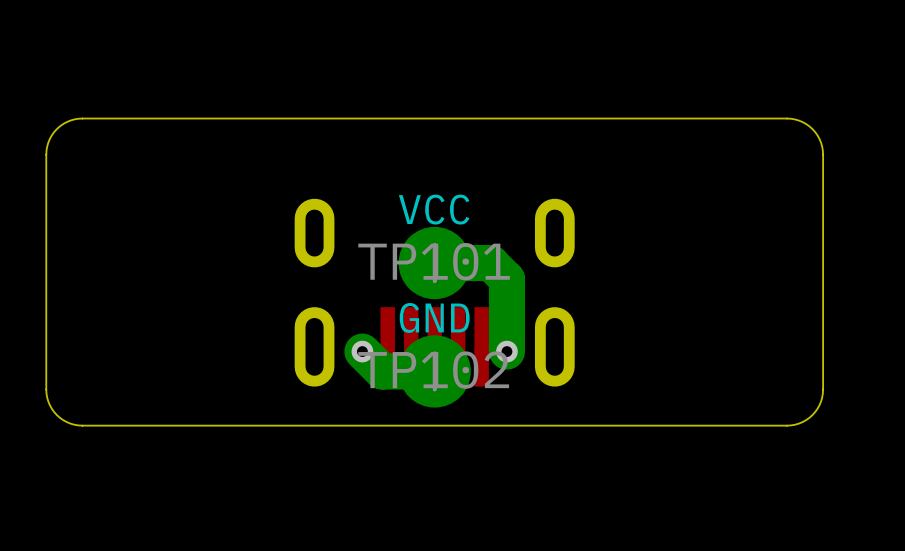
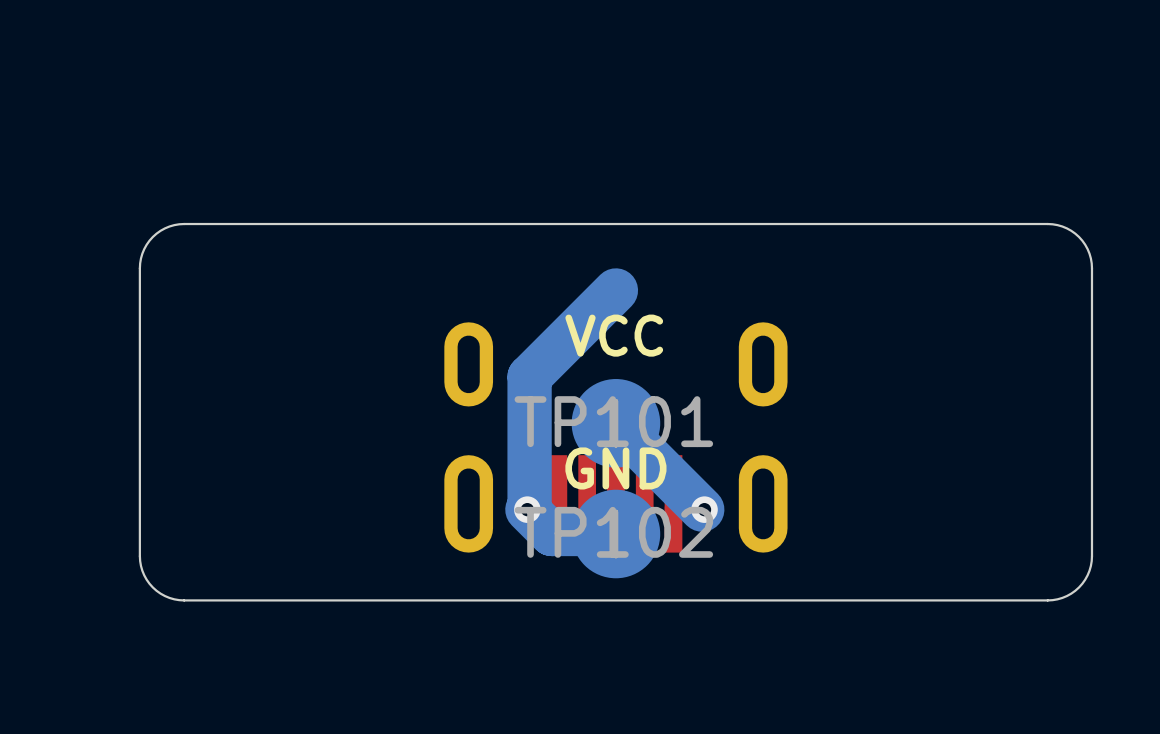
bottom track: none -> (615, 290) (529, 376) (529, 509)
bottom track: (434, 263) (490, 263) (506, 279) (506, 351) -> none
TP101 position: (434, 263) -> (615, 423)
bottom track: none -> (615, 423) (702, 509)

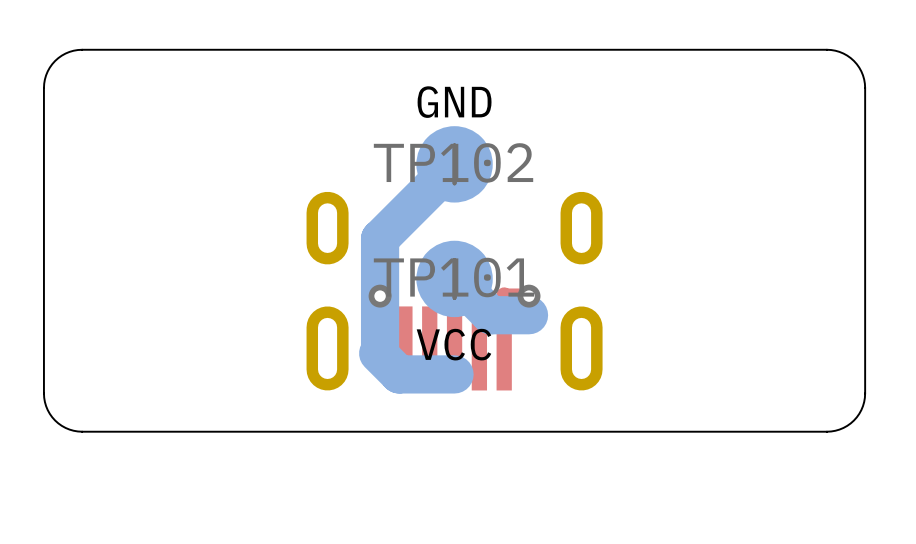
board edge: (1091, 268) (1089, 253) (1079, 236) (1066, 228) (1047, 224) (184, 224) (164, 228) (152, 236) (142, 253) (139, 268) -> (865, 145) (865, 87) (863, 75) (850, 58) (839, 51) (826, 49) (77, 50) (58, 58) (46, 75) (43, 87) (43, 145)
text position: VCC (614, 335) -> VCC (453, 344)
top track: none -> (504, 294) (529, 296)
bottom track: (658, 465) (702, 509) -> (490, 315) (529, 315)
text position: GND (615, 468) -> GND (454, 102)
via position: (527, 509) -> (380, 296)
via position: (704, 509) -> (529, 296)
TP102 position: (615, 534) -> (454, 164)

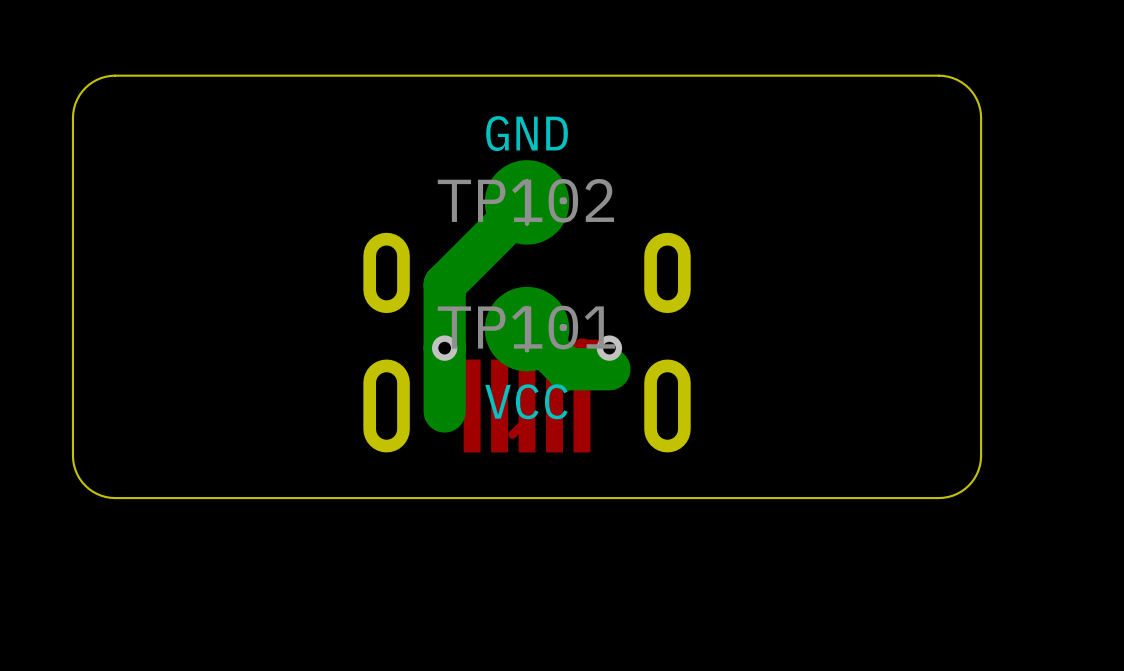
bottom track: (378, 353) (399, 374) (454, 374) -> none

